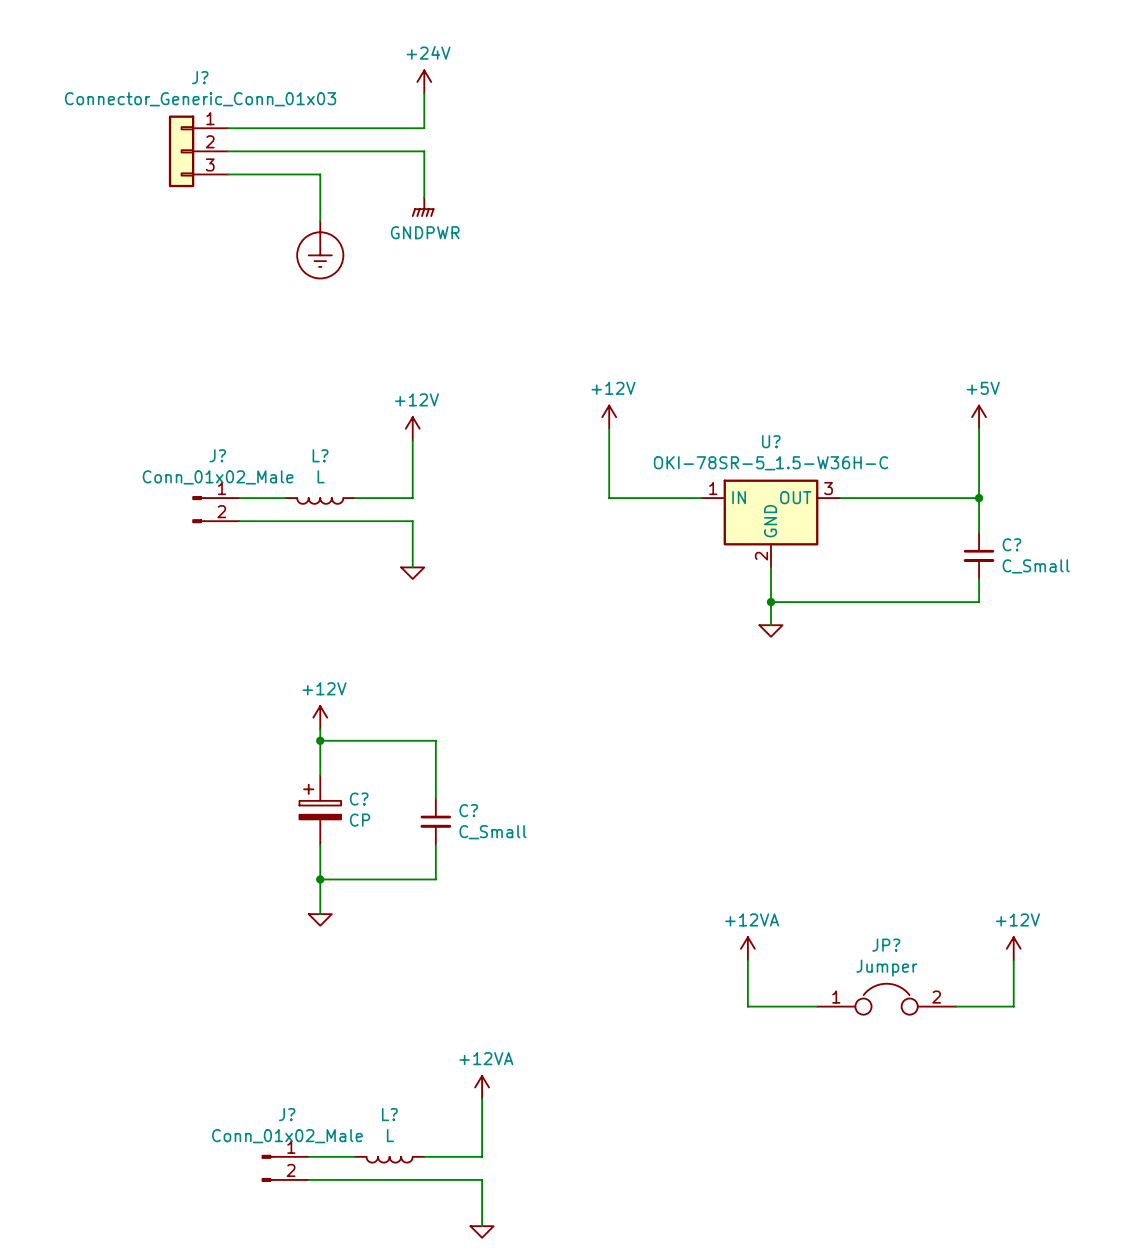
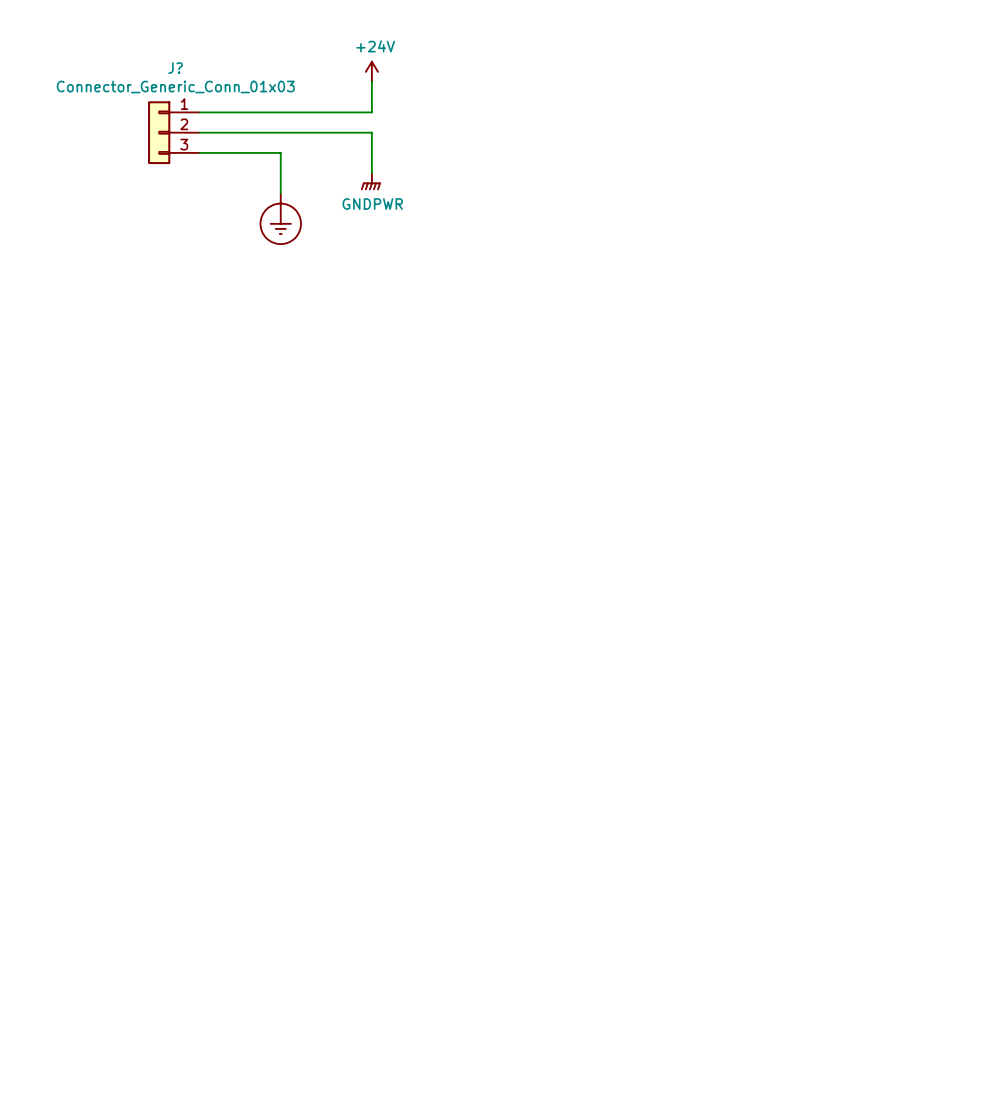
power symbol: +12V (609, 417) -> none
power symbol: +5V (979, 417) -> none
power symbol: +12V (412, 428) -> none
wire: (609, 428) (609, 498) (701, 498) -> none
wire: (979, 428) (979, 532) -> none
wire: (412, 440) (412, 498) (354, 498) -> none
wire: (239, 498) (285, 498) -> none
wire: (840, 498) (979, 498) -> none
junction: (979, 498) -> none
L?: L (320, 500) -> none
J?: Conn_01x02_Male (215, 509) -> none
wire: (239, 521) (412, 521) (412, 567) -> none
U?: OKI-78SR-5_1.5-W36H-C (771, 523) -> none
C?: C_Small (979, 555) -> none
wire: (771, 567) (771, 625) -> none
power symbol: (412, 573) -> none
wire: (979, 578) (979, 602) (771, 602) -> none
junction: (771, 602) -> none
power symbol: (771, 630) -> none
power symbol: +12V (320, 717) -> none
wire: (320, 729) (320, 775) -> none
wire: (320, 740) (435, 740) (435, 798) -> none
junction: (320, 740) -> none
C?: CP (320, 810) -> none
C?: C_Small (435, 821) -> none
wire: (320, 844) (320, 914) -> none
wire: (435, 844) (435, 879) (320, 879) -> none
junction: (320, 879) -> none
power symbol: (320, 919) -> none
power symbol: +12VA (747, 948) -> none
power symbol: +12V (1013, 948) -> none
wire: (747, 960) (747, 1006) (817, 1006) -> none
wire: (1013, 960) (1013, 1006) (955, 1006) -> none
JP?: Jumper (886, 999) -> none
power symbol: +12VA (482, 1087) -> none
wire: (482, 1099) (482, 1156) (424, 1156) -> none
wire: (308, 1156) (354, 1156) -> none
L?: L (389, 1159) -> none
J?: Conn_01x02_Male (285, 1168) -> none
wire: (308, 1179) (482, 1179) (482, 1226) -> none
power symbol: (482, 1231) -> none

